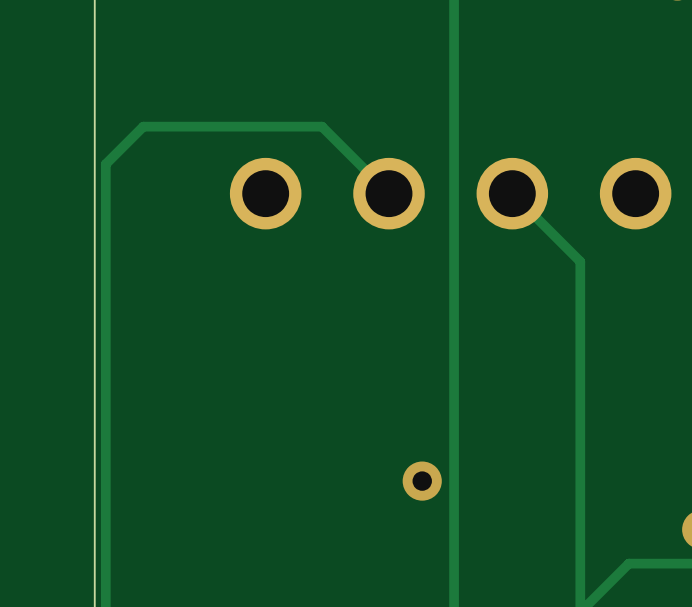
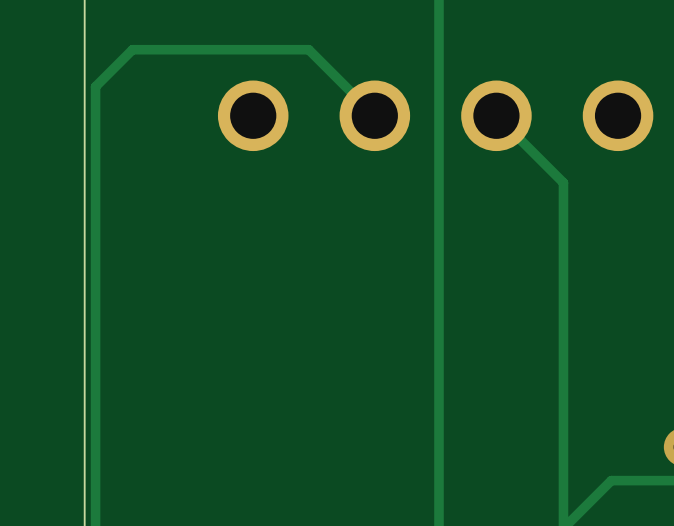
via: (422, 481) -> none

